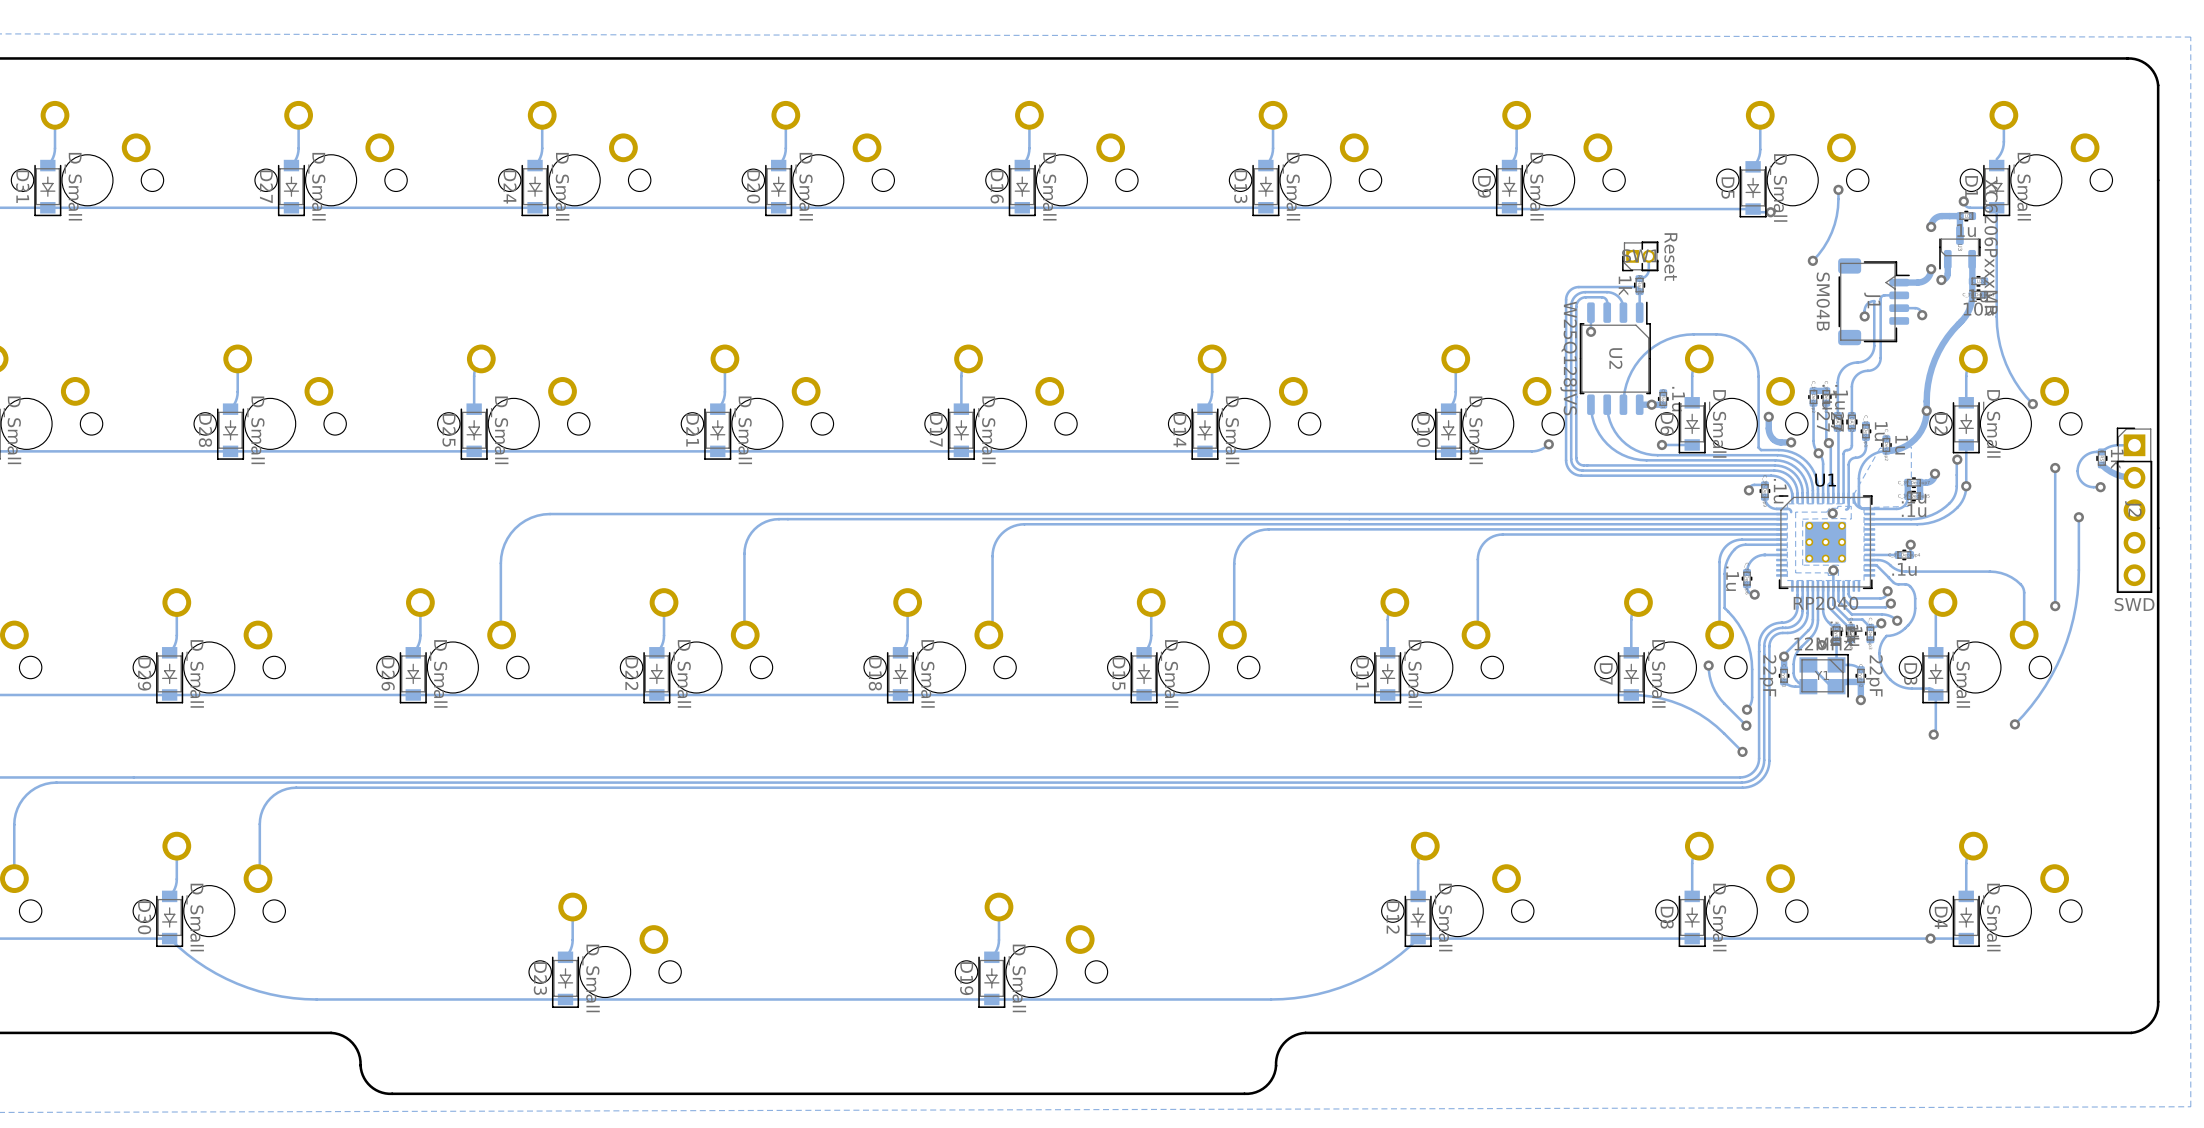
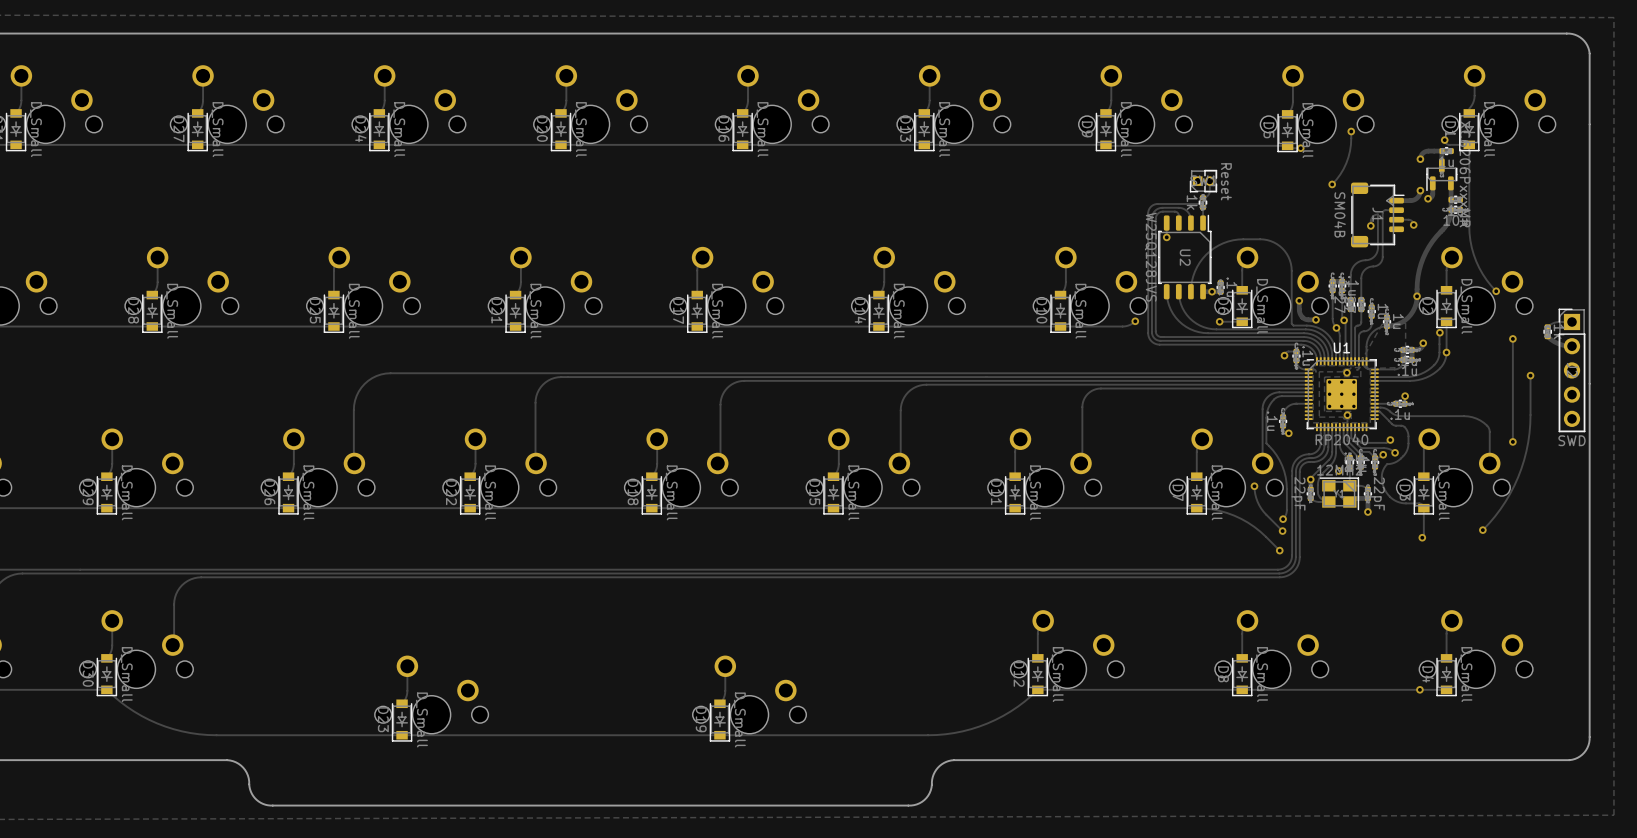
track: (2101, 451) (2091, 452) (2085, 455) (2080, 461) (2077, 471) (2078, 477) (2083, 483) (2091, 487) (2100, 487) -> none
via: (2100, 487) -> none
track: (1848, 586) (1848, 595) (1852, 598) (1882, 598) (1887, 591) -> none
via: (1887, 591) -> none

